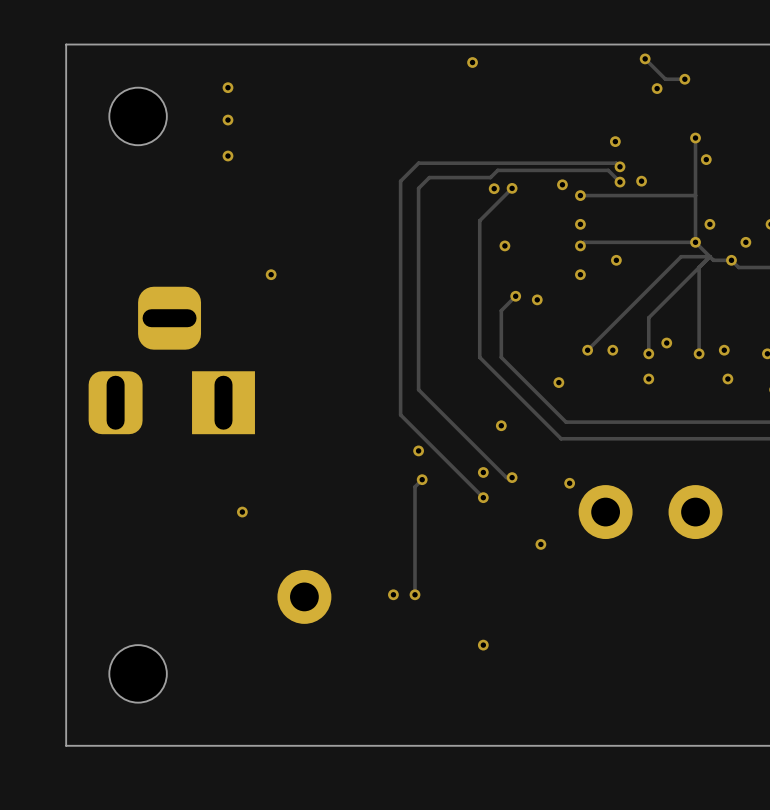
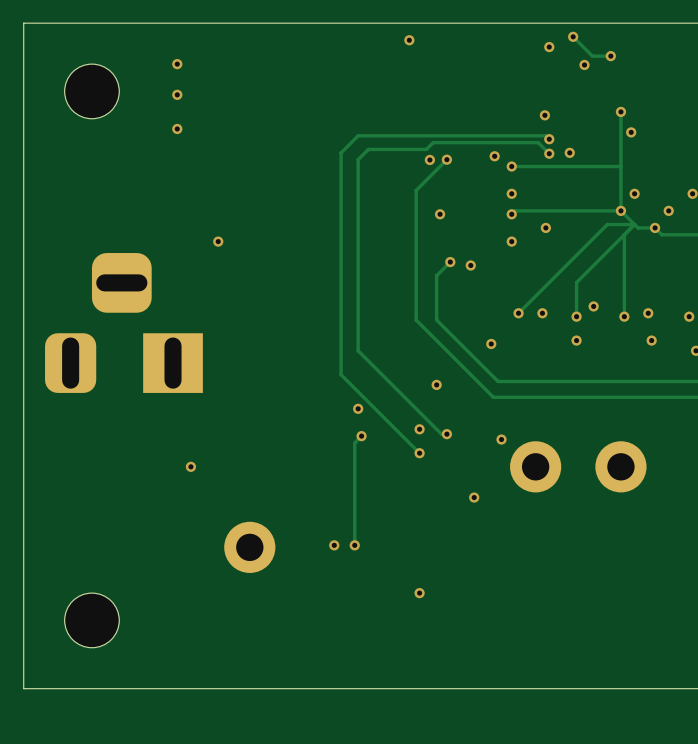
via: none -> (549, 47)

